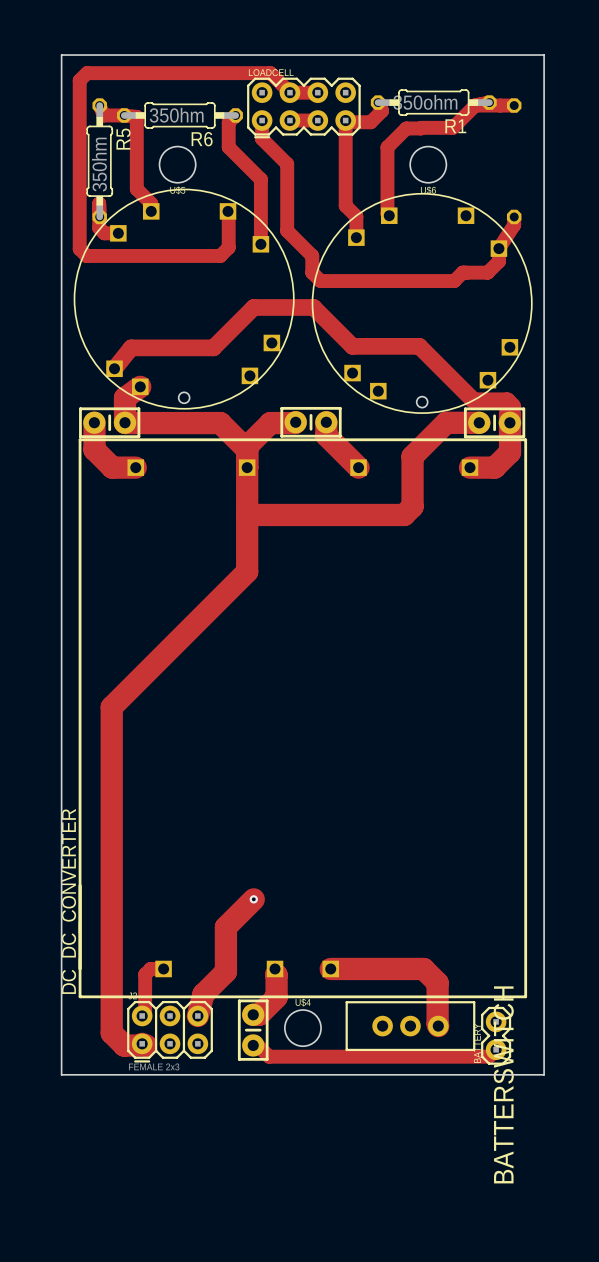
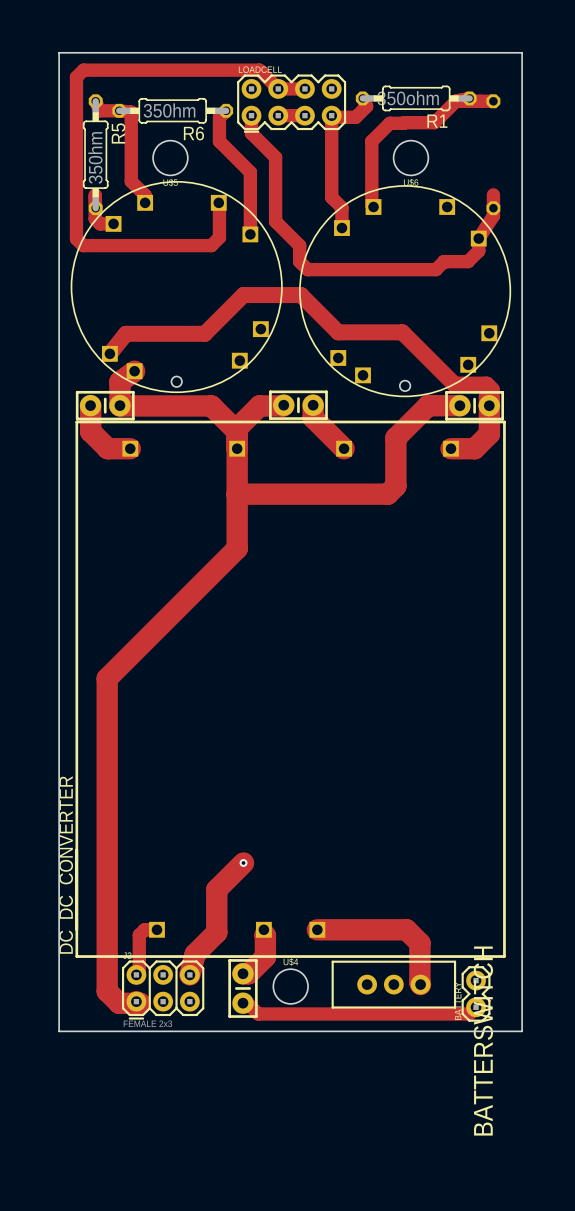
track: none -> (493, 194) (493, 208)

